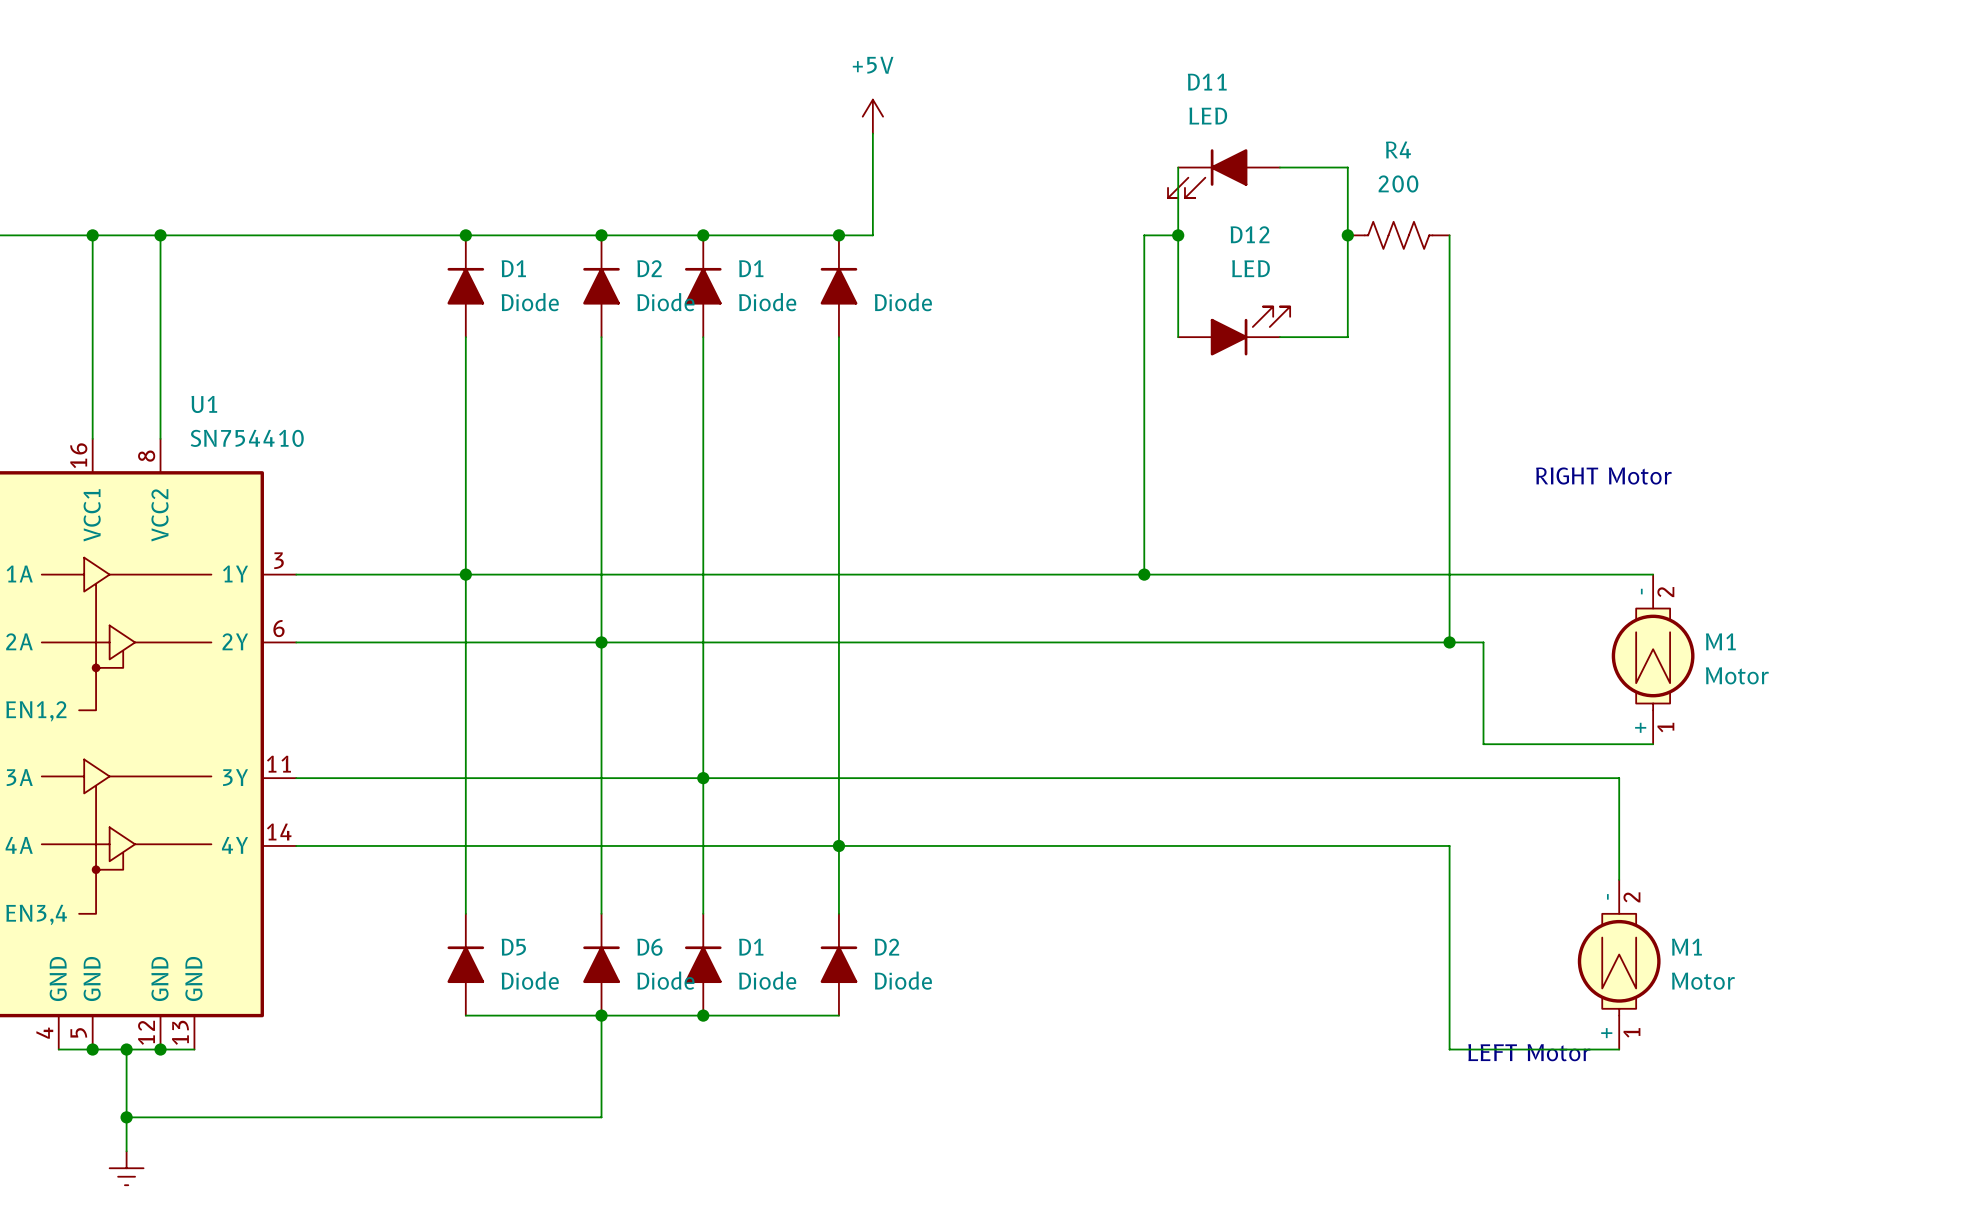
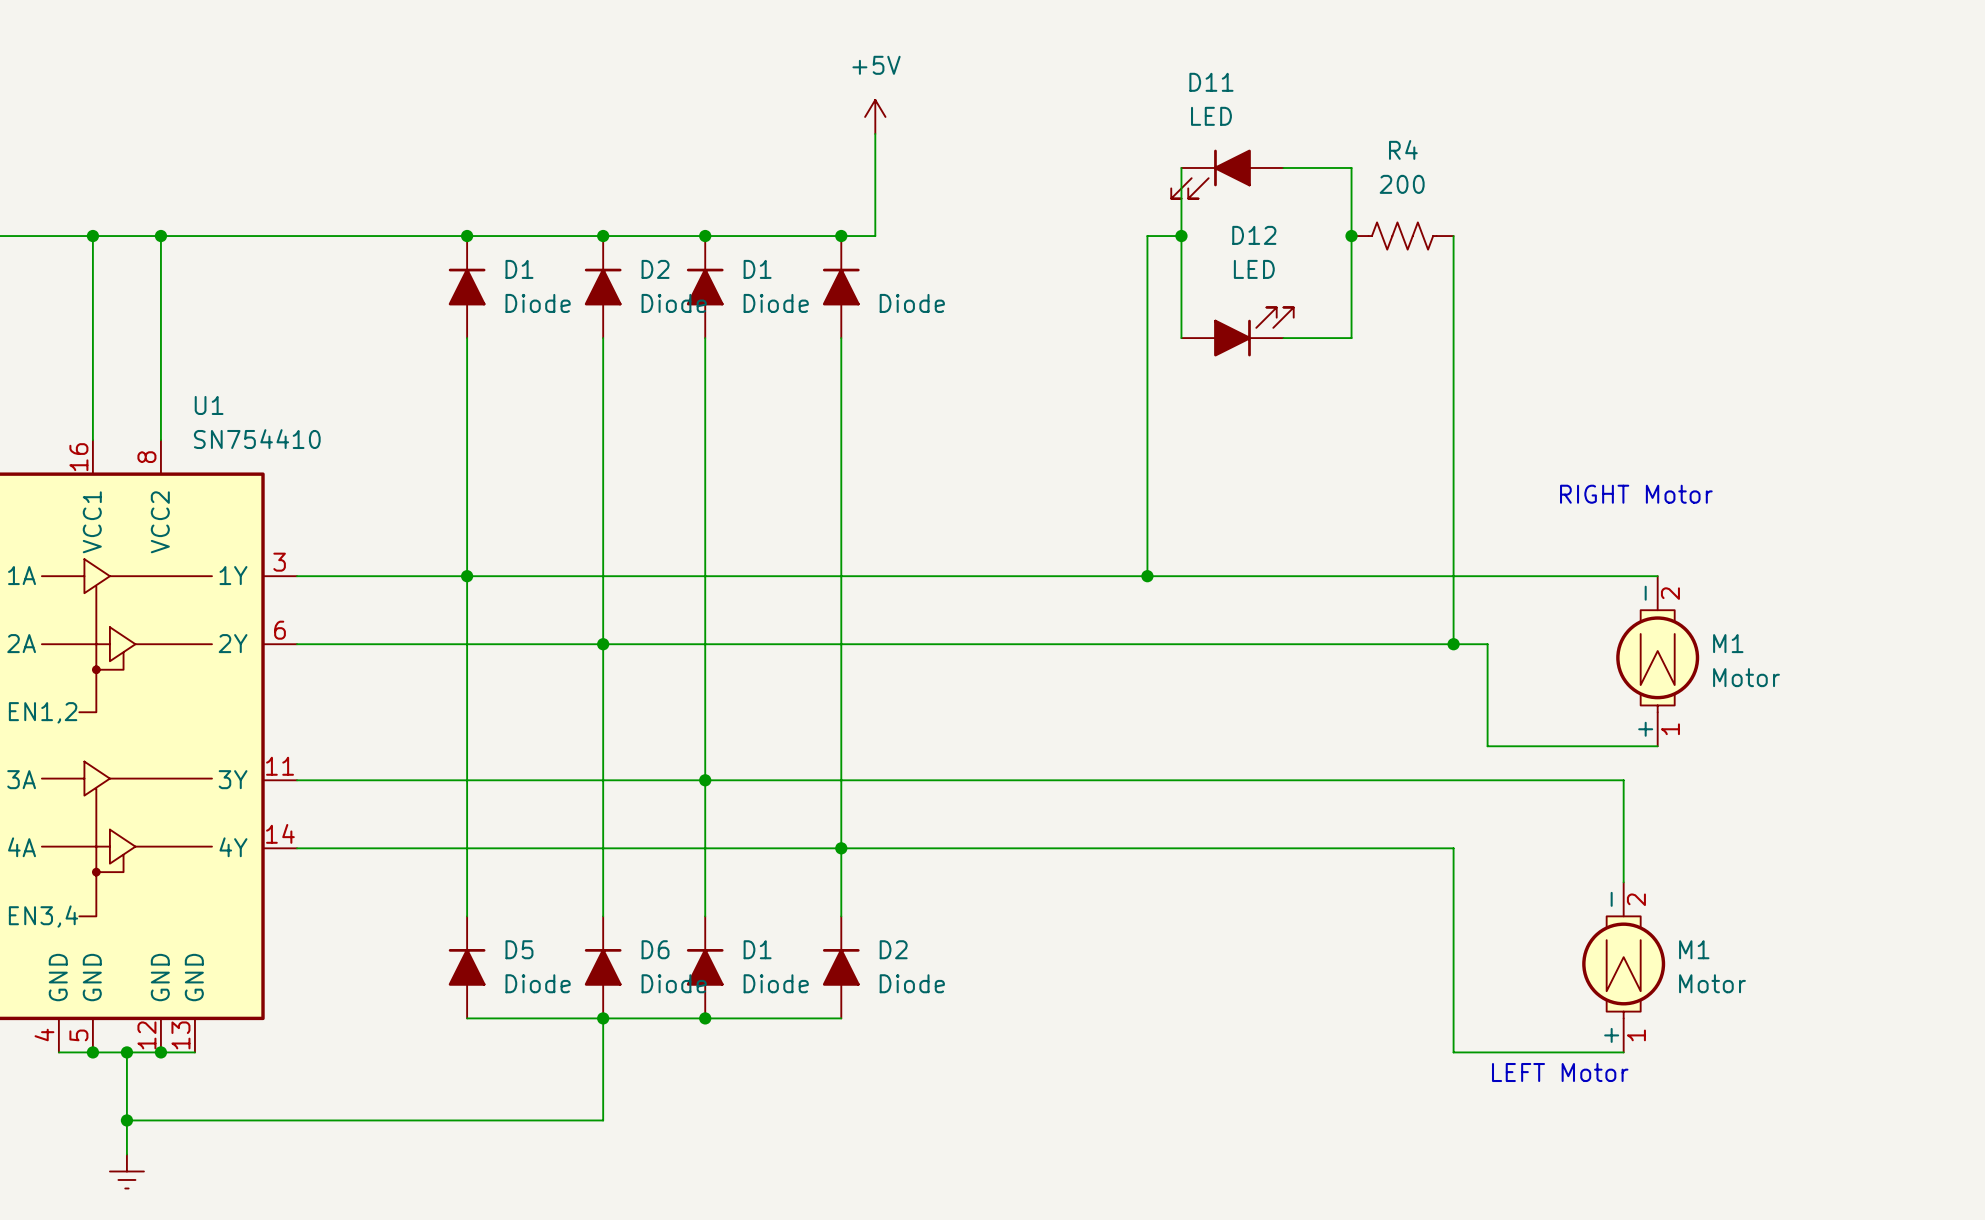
text position: RIGHT Motor (1603, 475) -> RIGHT Motor (1636, 494)
text position: LEFT Motor (1529, 1052) -> LEFT Motor (1560, 1072)

